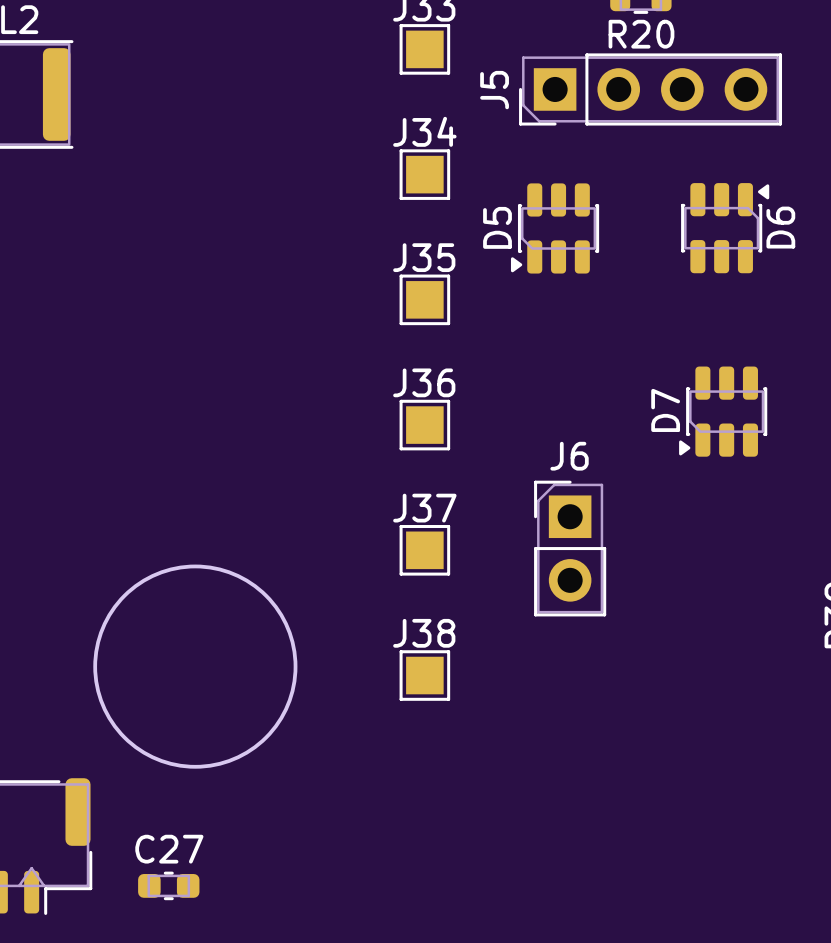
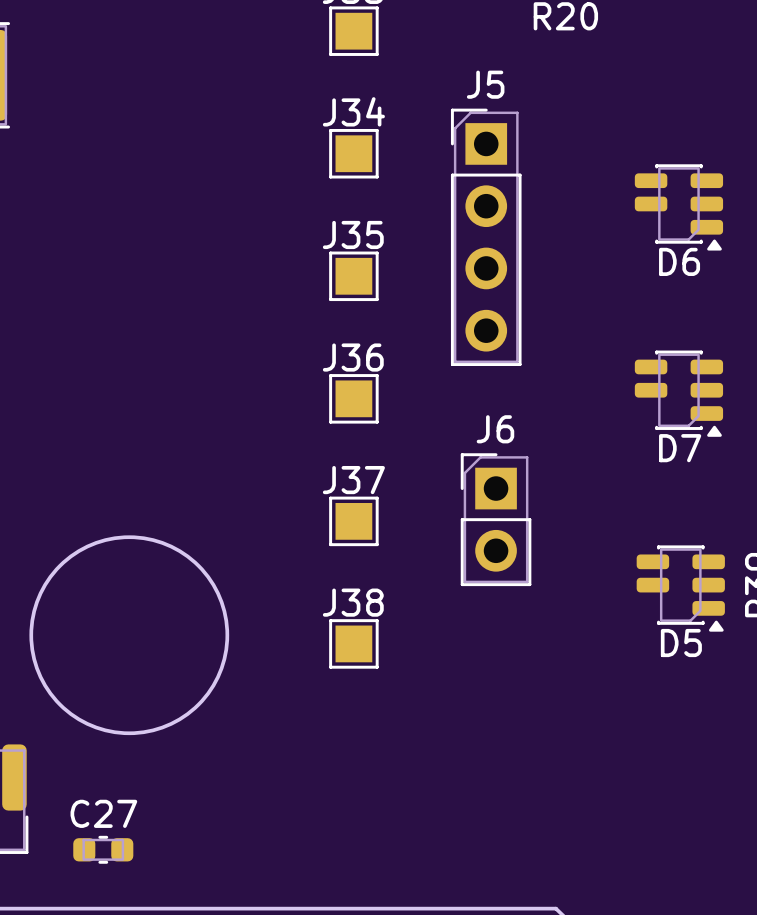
J5 rotation: 0° (650, 89) -> 90° clockwise (486, 237)
J5 position: (650, 89) -> (486, 237)
D5 footprint: [510, 183, 600, 274] -> [636, 545, 725, 632]
D6 footprint: [681, 183, 770, 274] -> [634, 164, 724, 251]
D5 name position: D5 (497, 227) -> D5 (681, 643)
D6 name position: D6 (780, 227) -> D6 (679, 261)
D7 footprint: [679, 366, 768, 457] -> [634, 350, 724, 437]
D7 name position: D7 (665, 410) -> D7 (680, 448)

